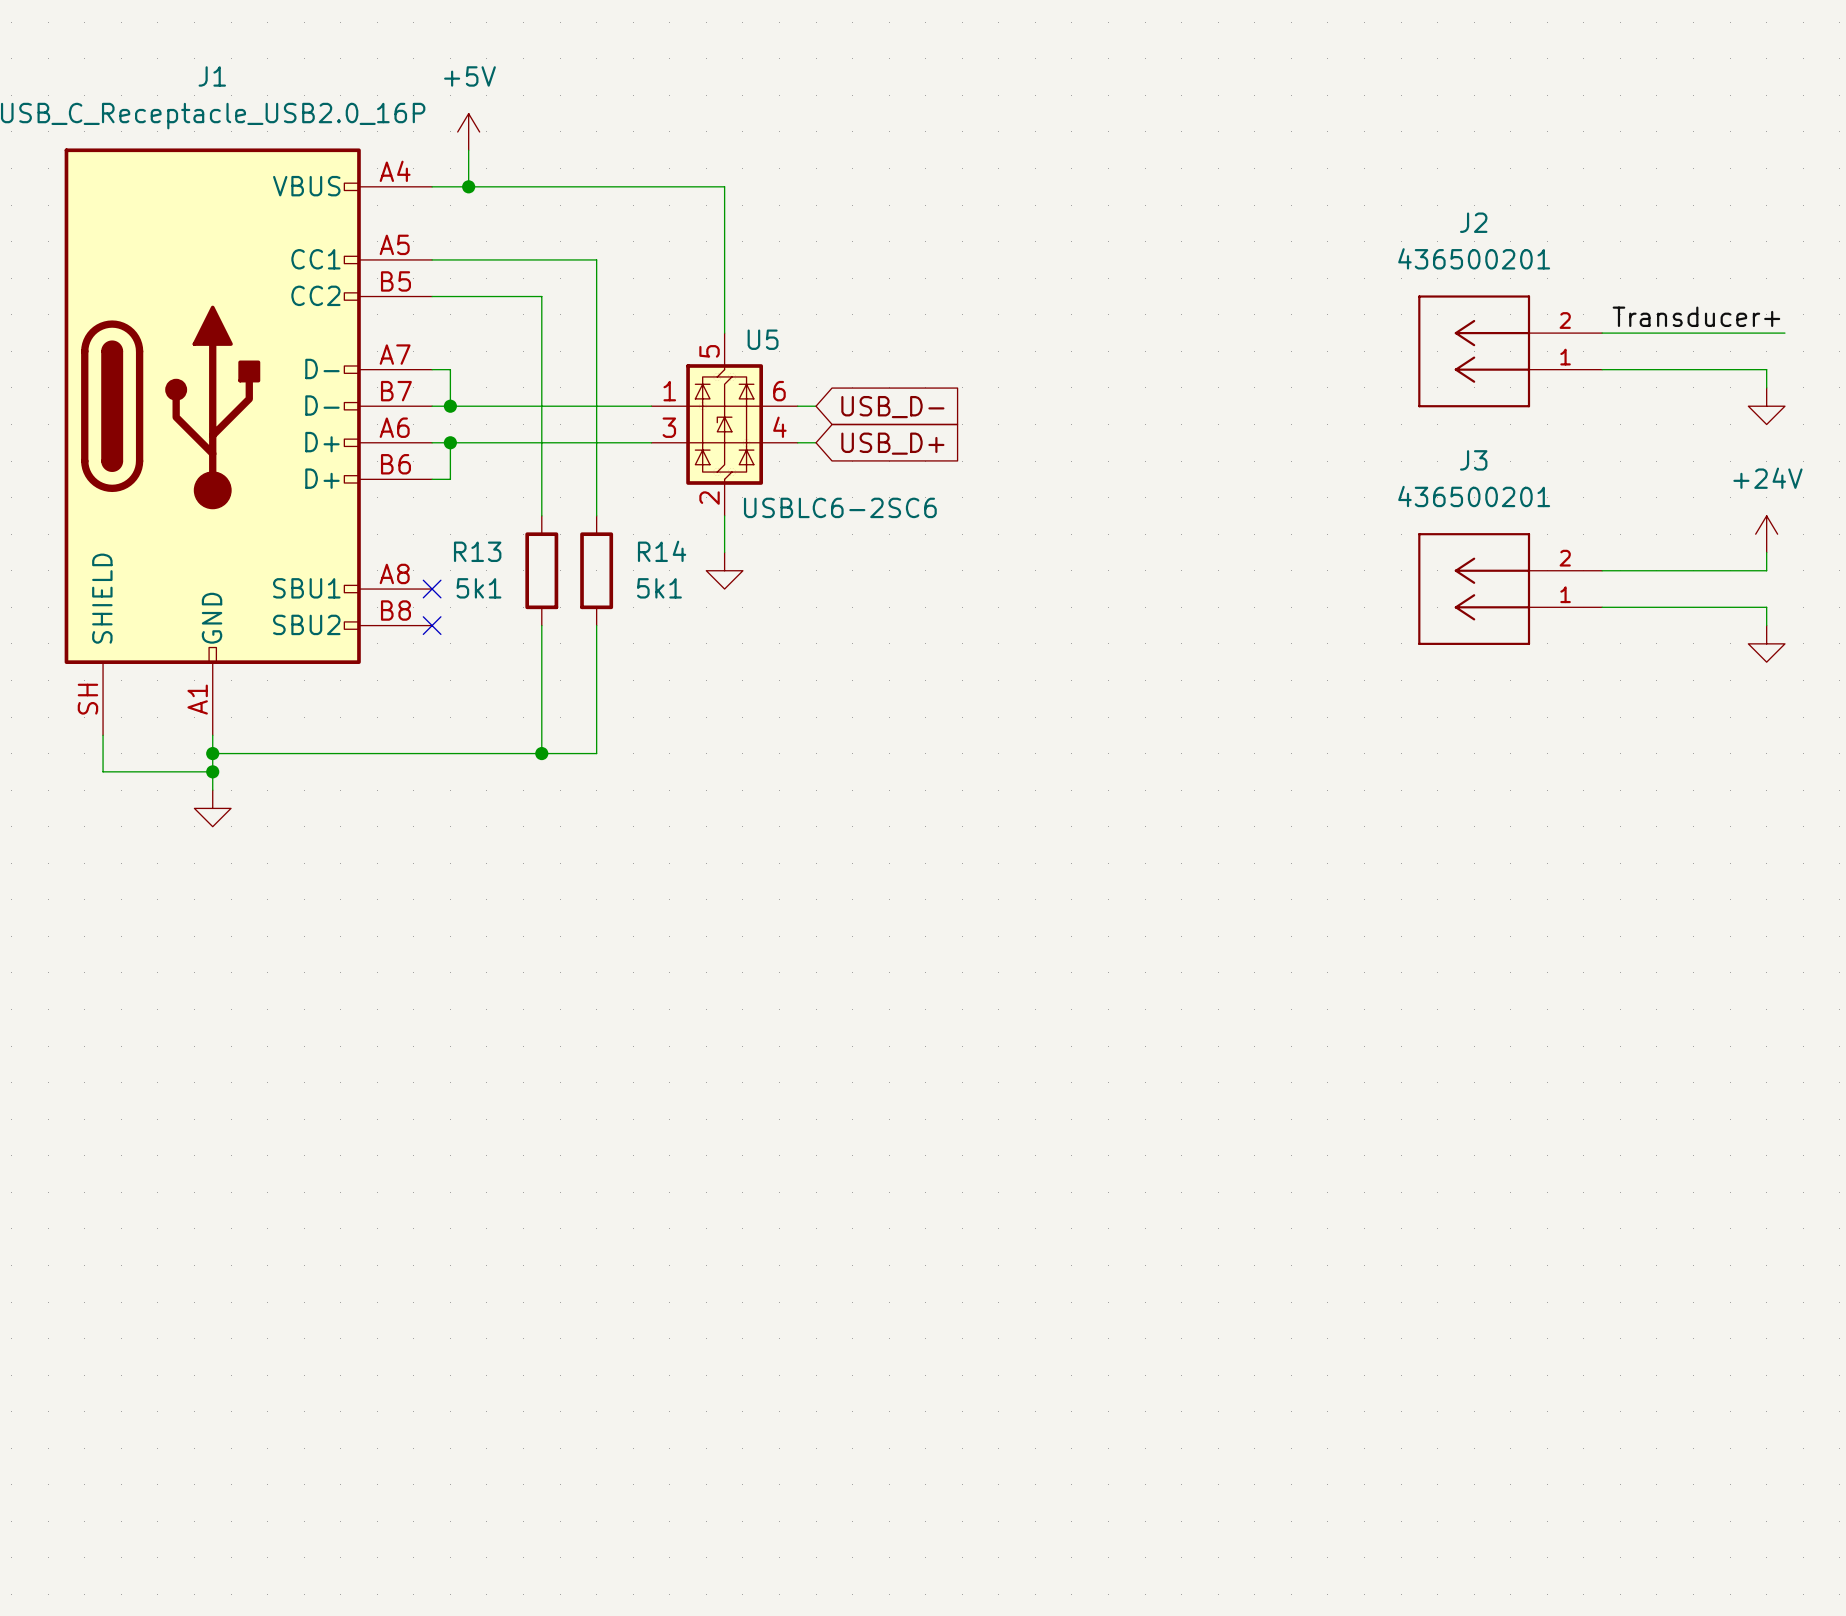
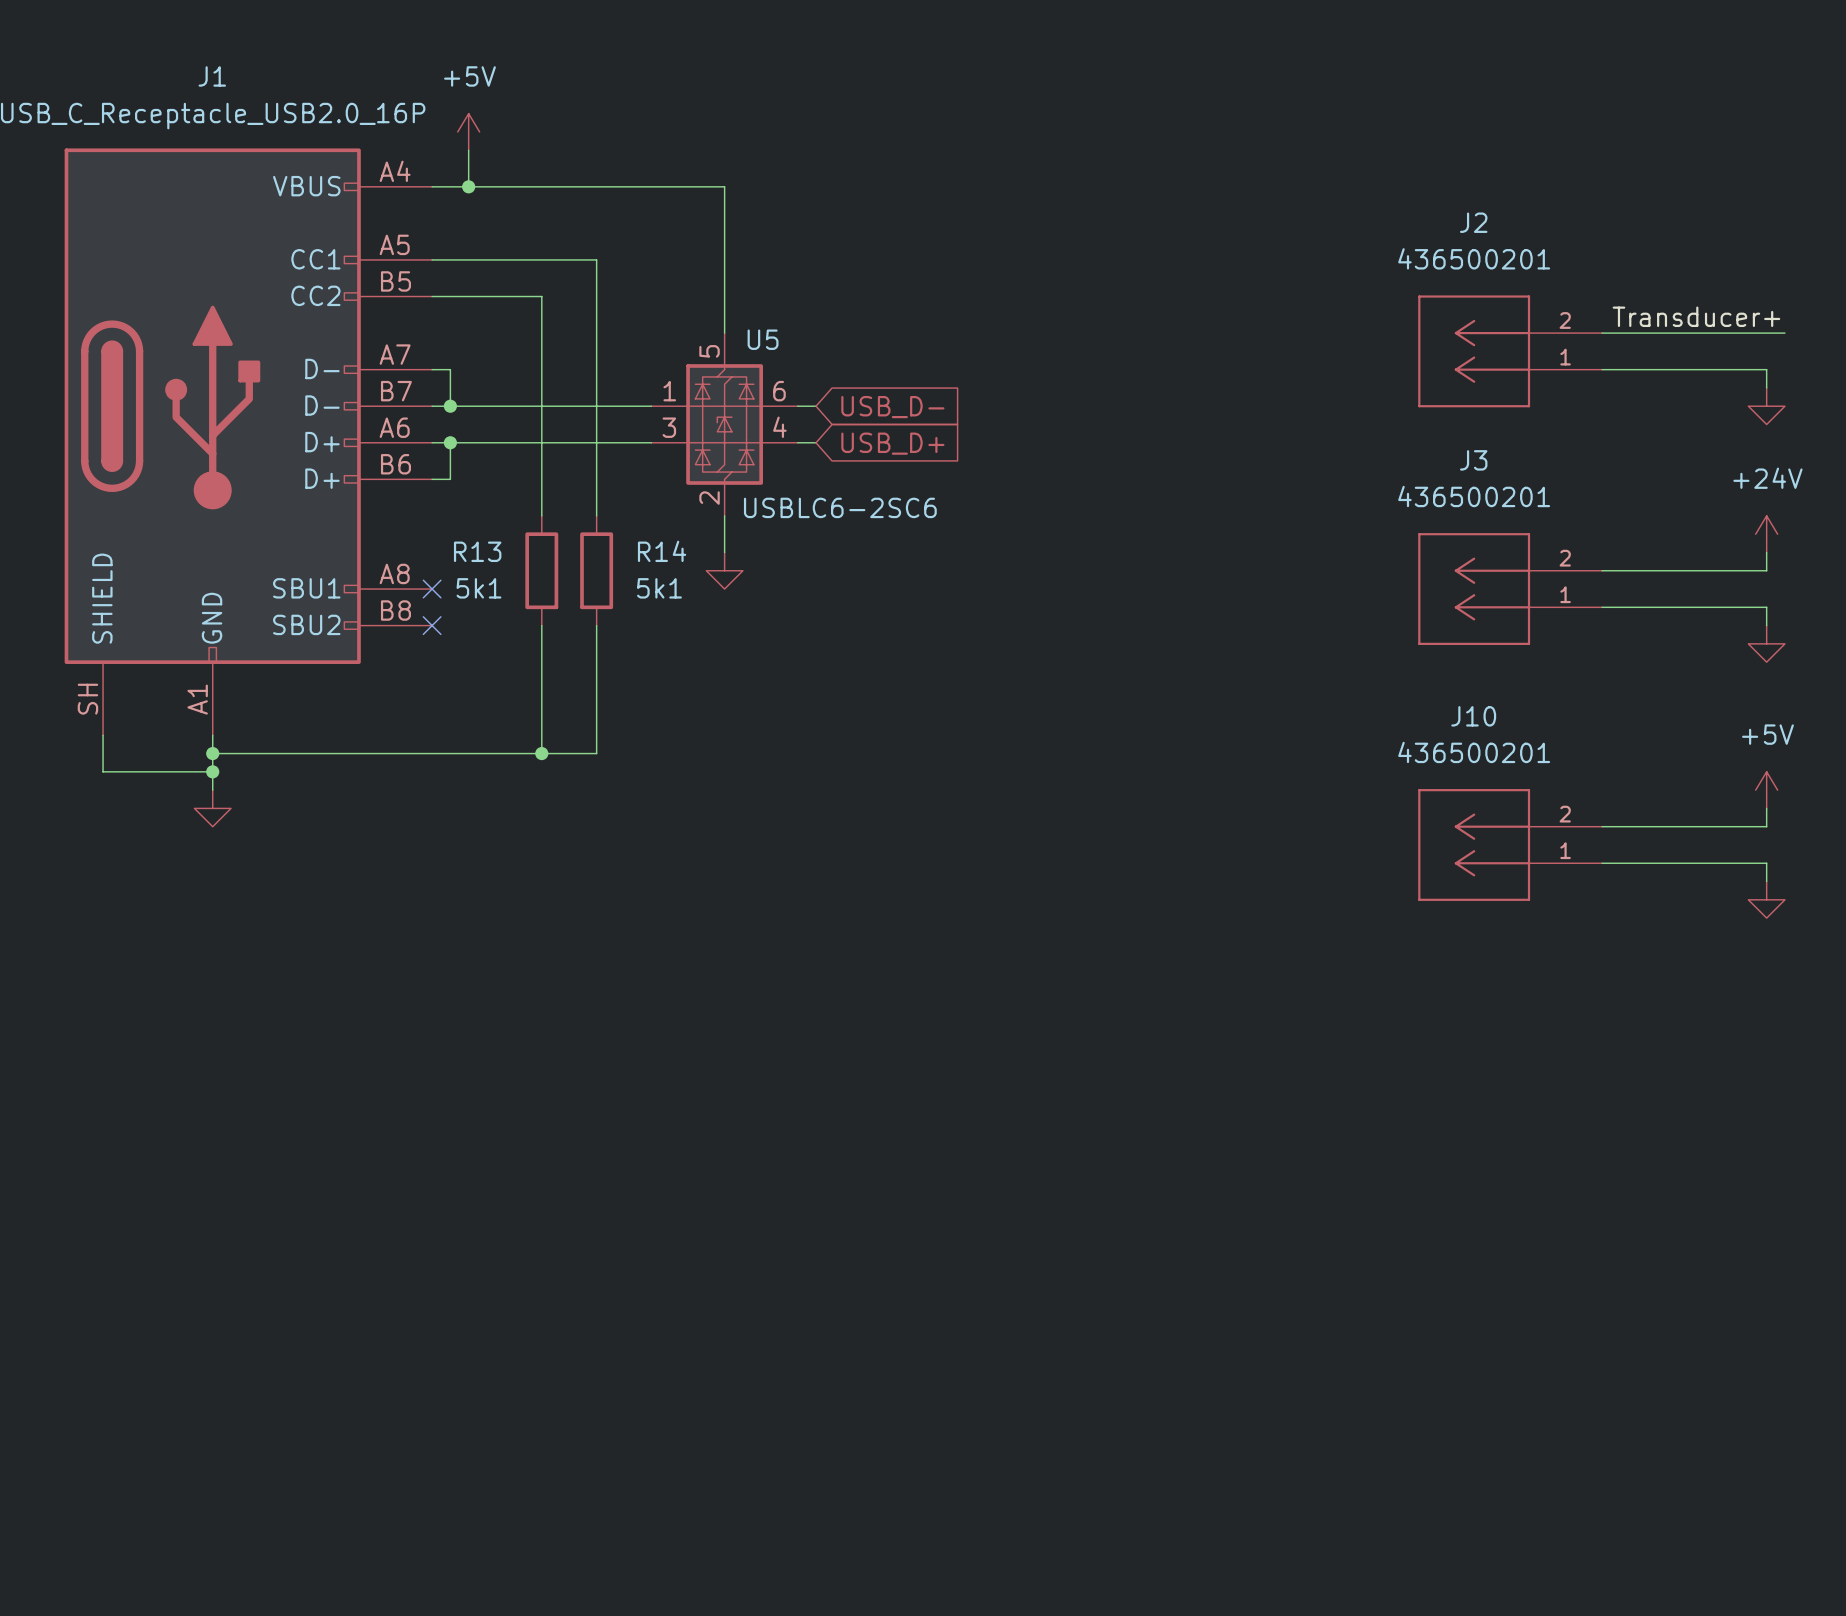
power symbol: none -> +5V (1766, 790)
wire: none -> (1766, 808) (1766, 826) (1602, 826)
J10: none -> 436500201 (1510, 844)
wire: none -> (1602, 863) (1766, 863) (1766, 881)
power symbol: none -> (1766, 899)

